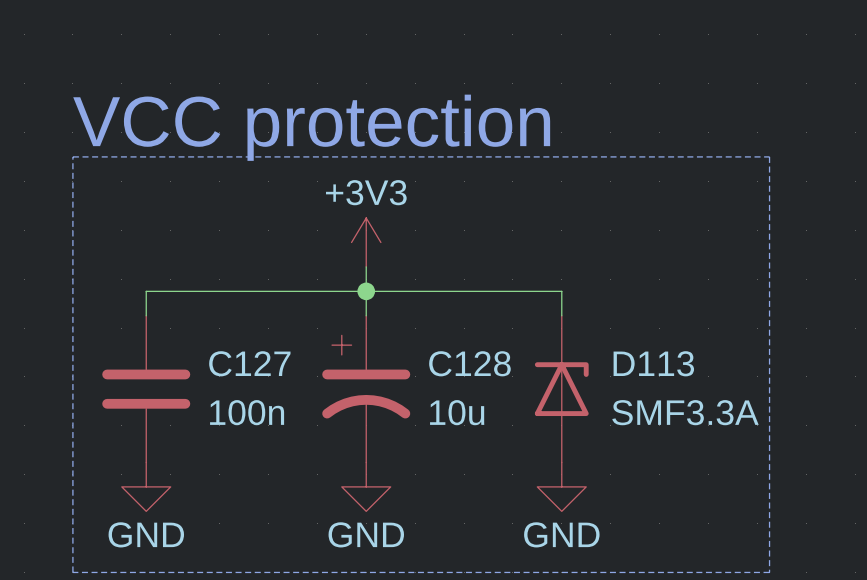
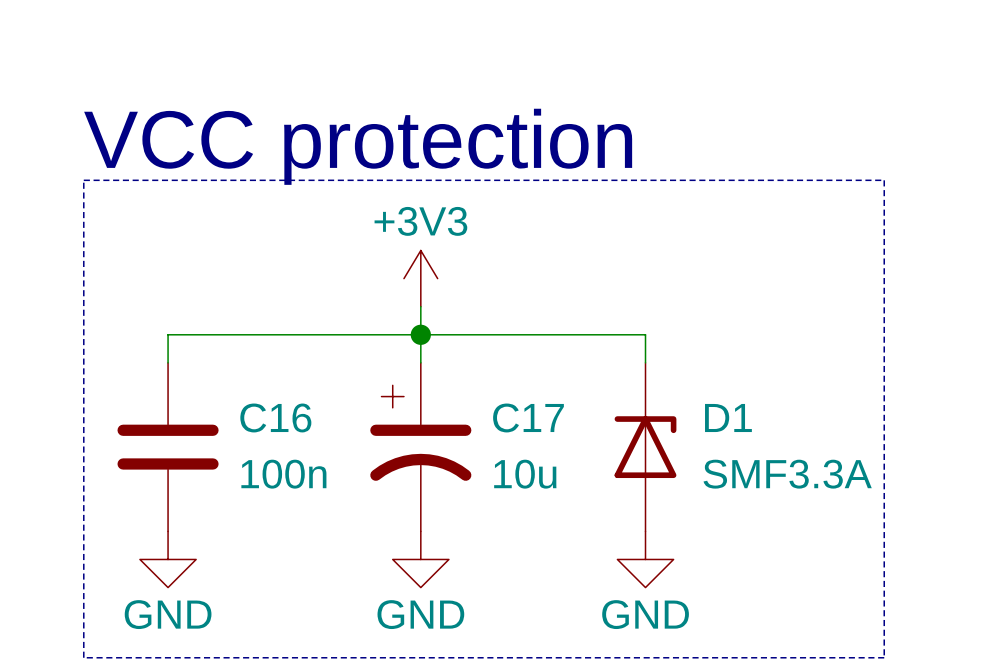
C127 name: C127 (249, 363) -> C16 (275, 417)
C128 name: C128 (469, 363) -> C17 (528, 417)
D113 name: D113 (653, 363) -> D1 (728, 417)

